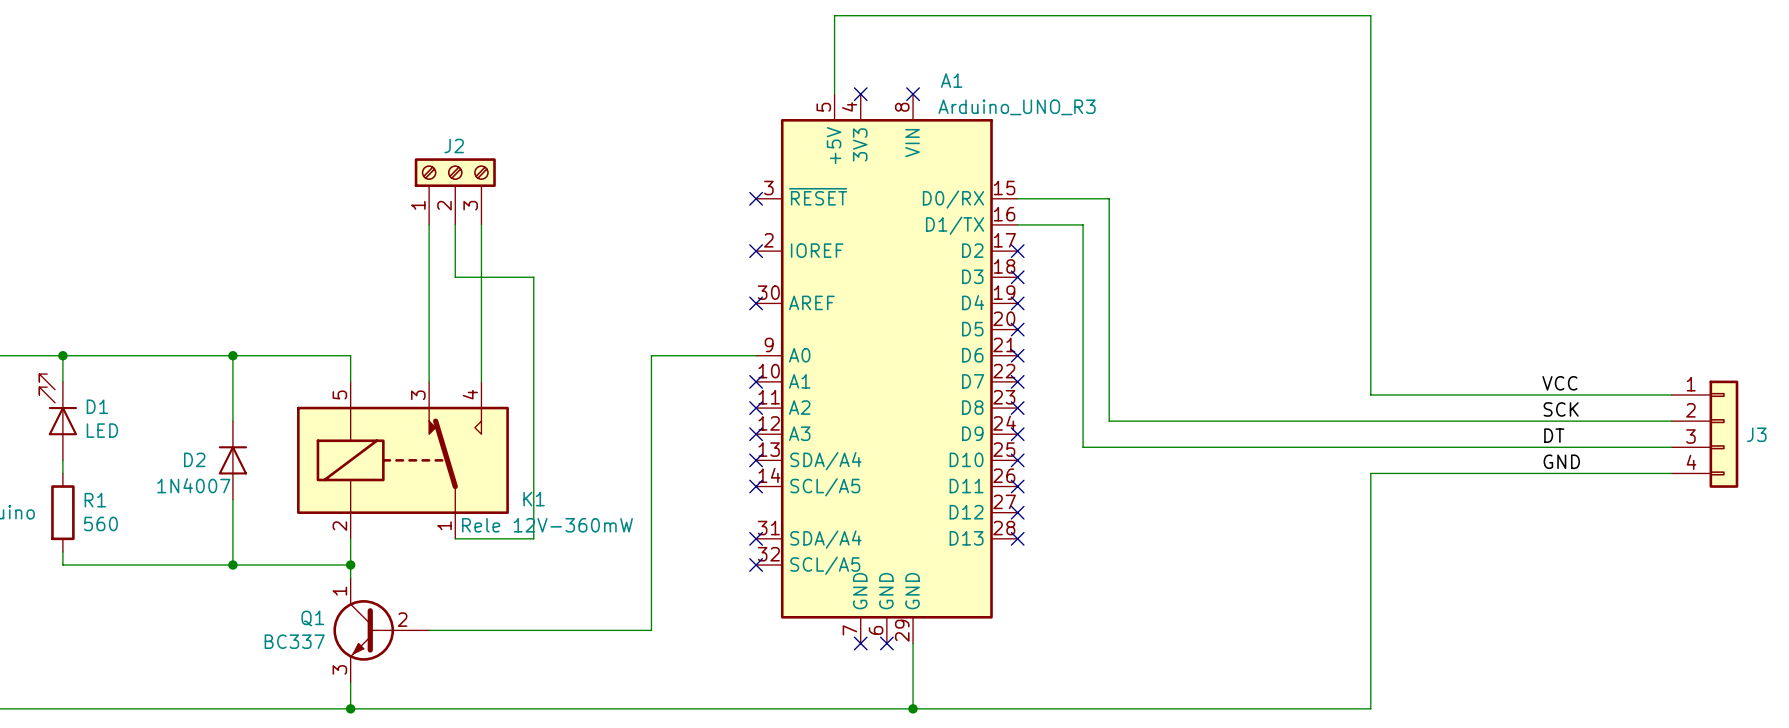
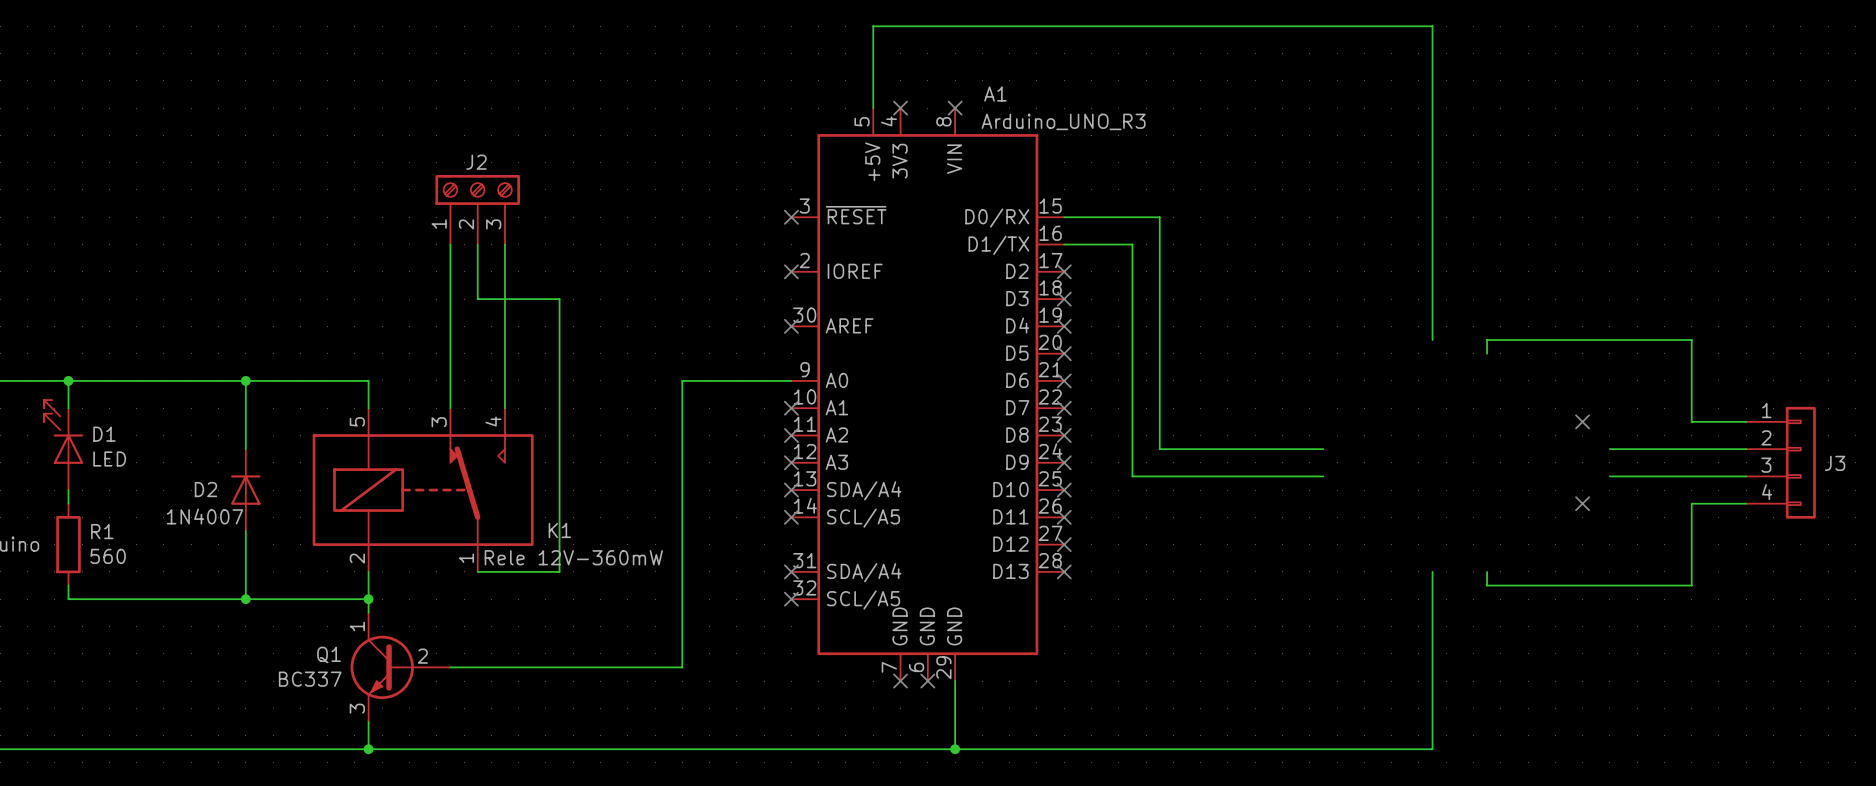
wire: (1370, 316) (1370, 394) (1619, 394) -> (1487, 353) (1487, 340) (1691, 340) (1691, 421)
label: VCC (1559, 383) -> none
no-connect mark: none -> (1582, 421)
label: SCK (1561, 409) -> none
wire: (1266, 421) (1540, 421) -> none
label: DT (1554, 435) -> none
wire: (1266, 447) (1540, 447) -> none
label: GND (1561, 461) -> none
no-connect mark: none -> (1582, 503)
wire: (1619, 473) (1370, 473) (1370, 538) -> (1691, 503) (1691, 585) (1487, 585) (1487, 571)

